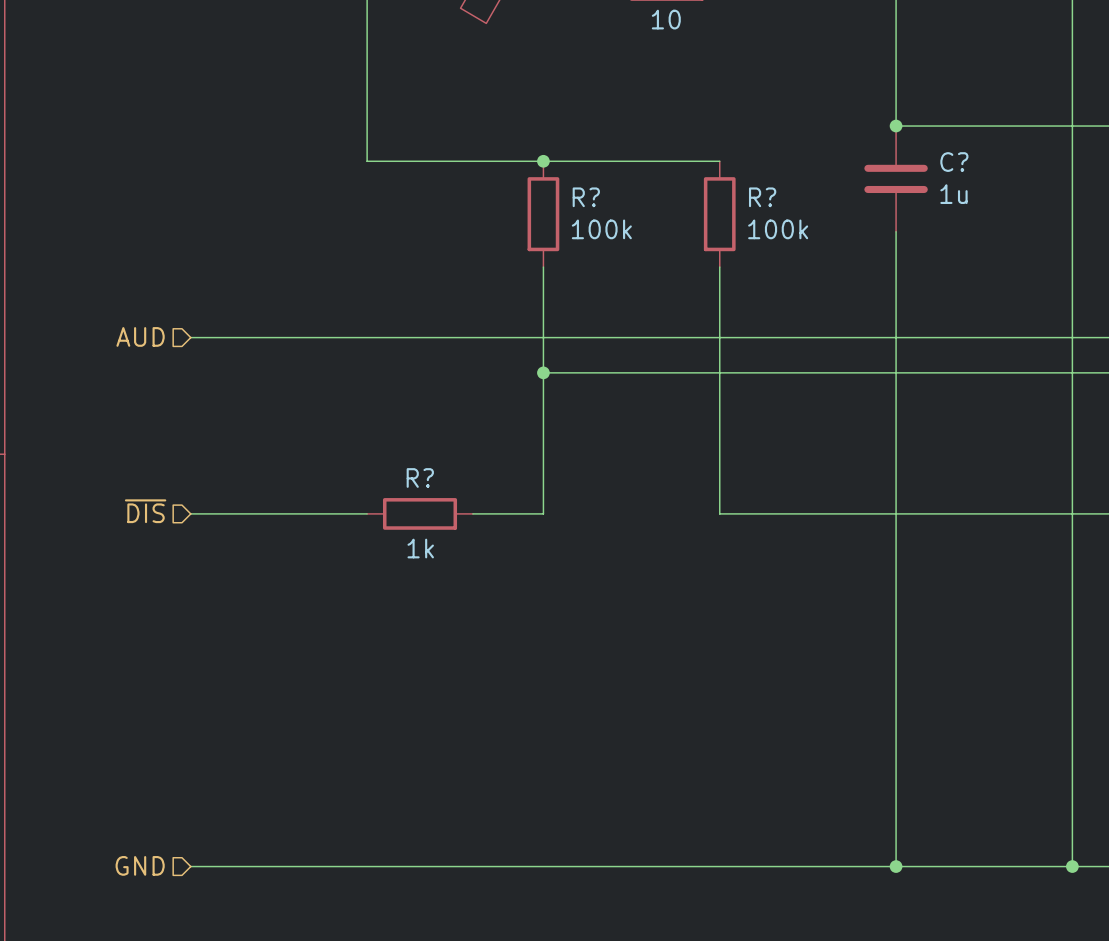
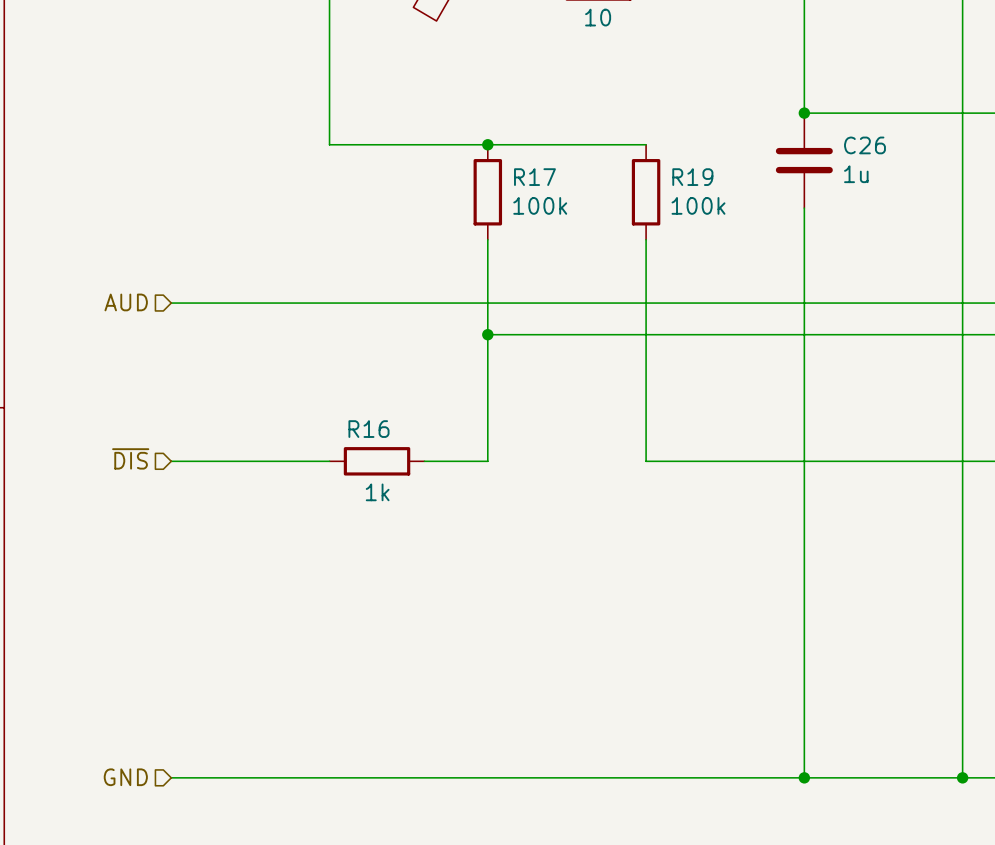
C? name: C? (954, 162) -> C26 (864, 145)
R? name: R? (586, 197) -> R17 (534, 177)
R? name: R? (762, 197) -> R19 (692, 177)
R? name: R? (420, 477) -> R16 (368, 429)

